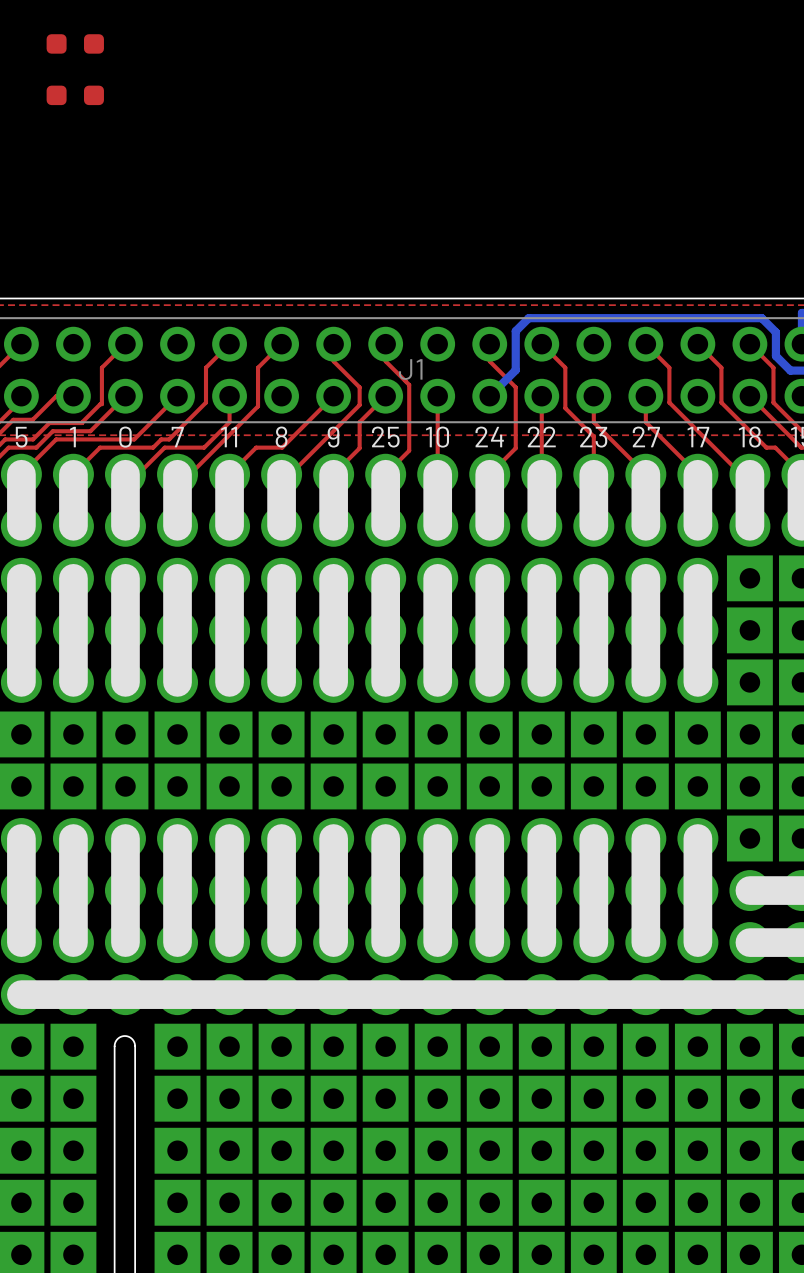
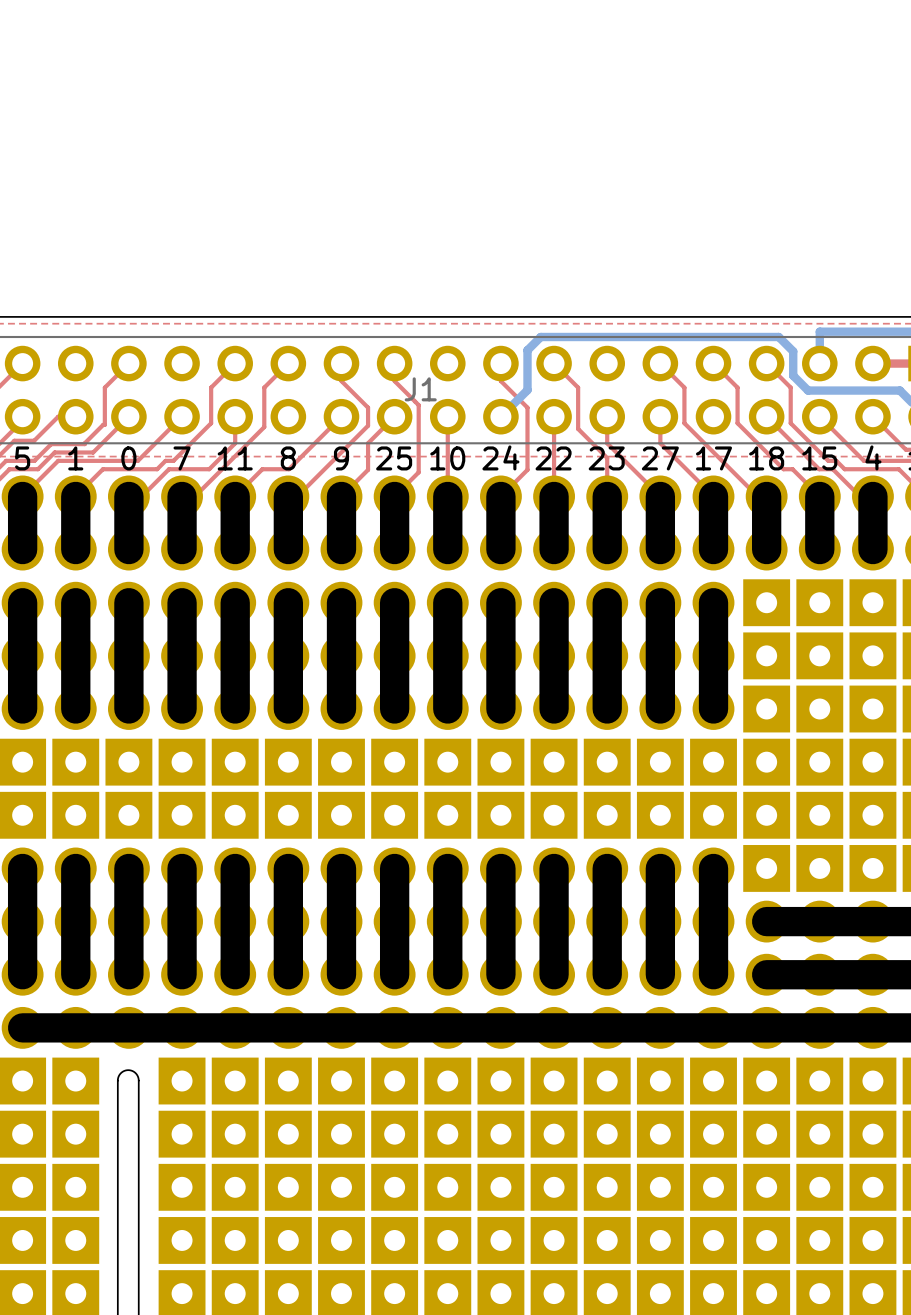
part: (75, 43) -> none
part: (75, 95) -> none

